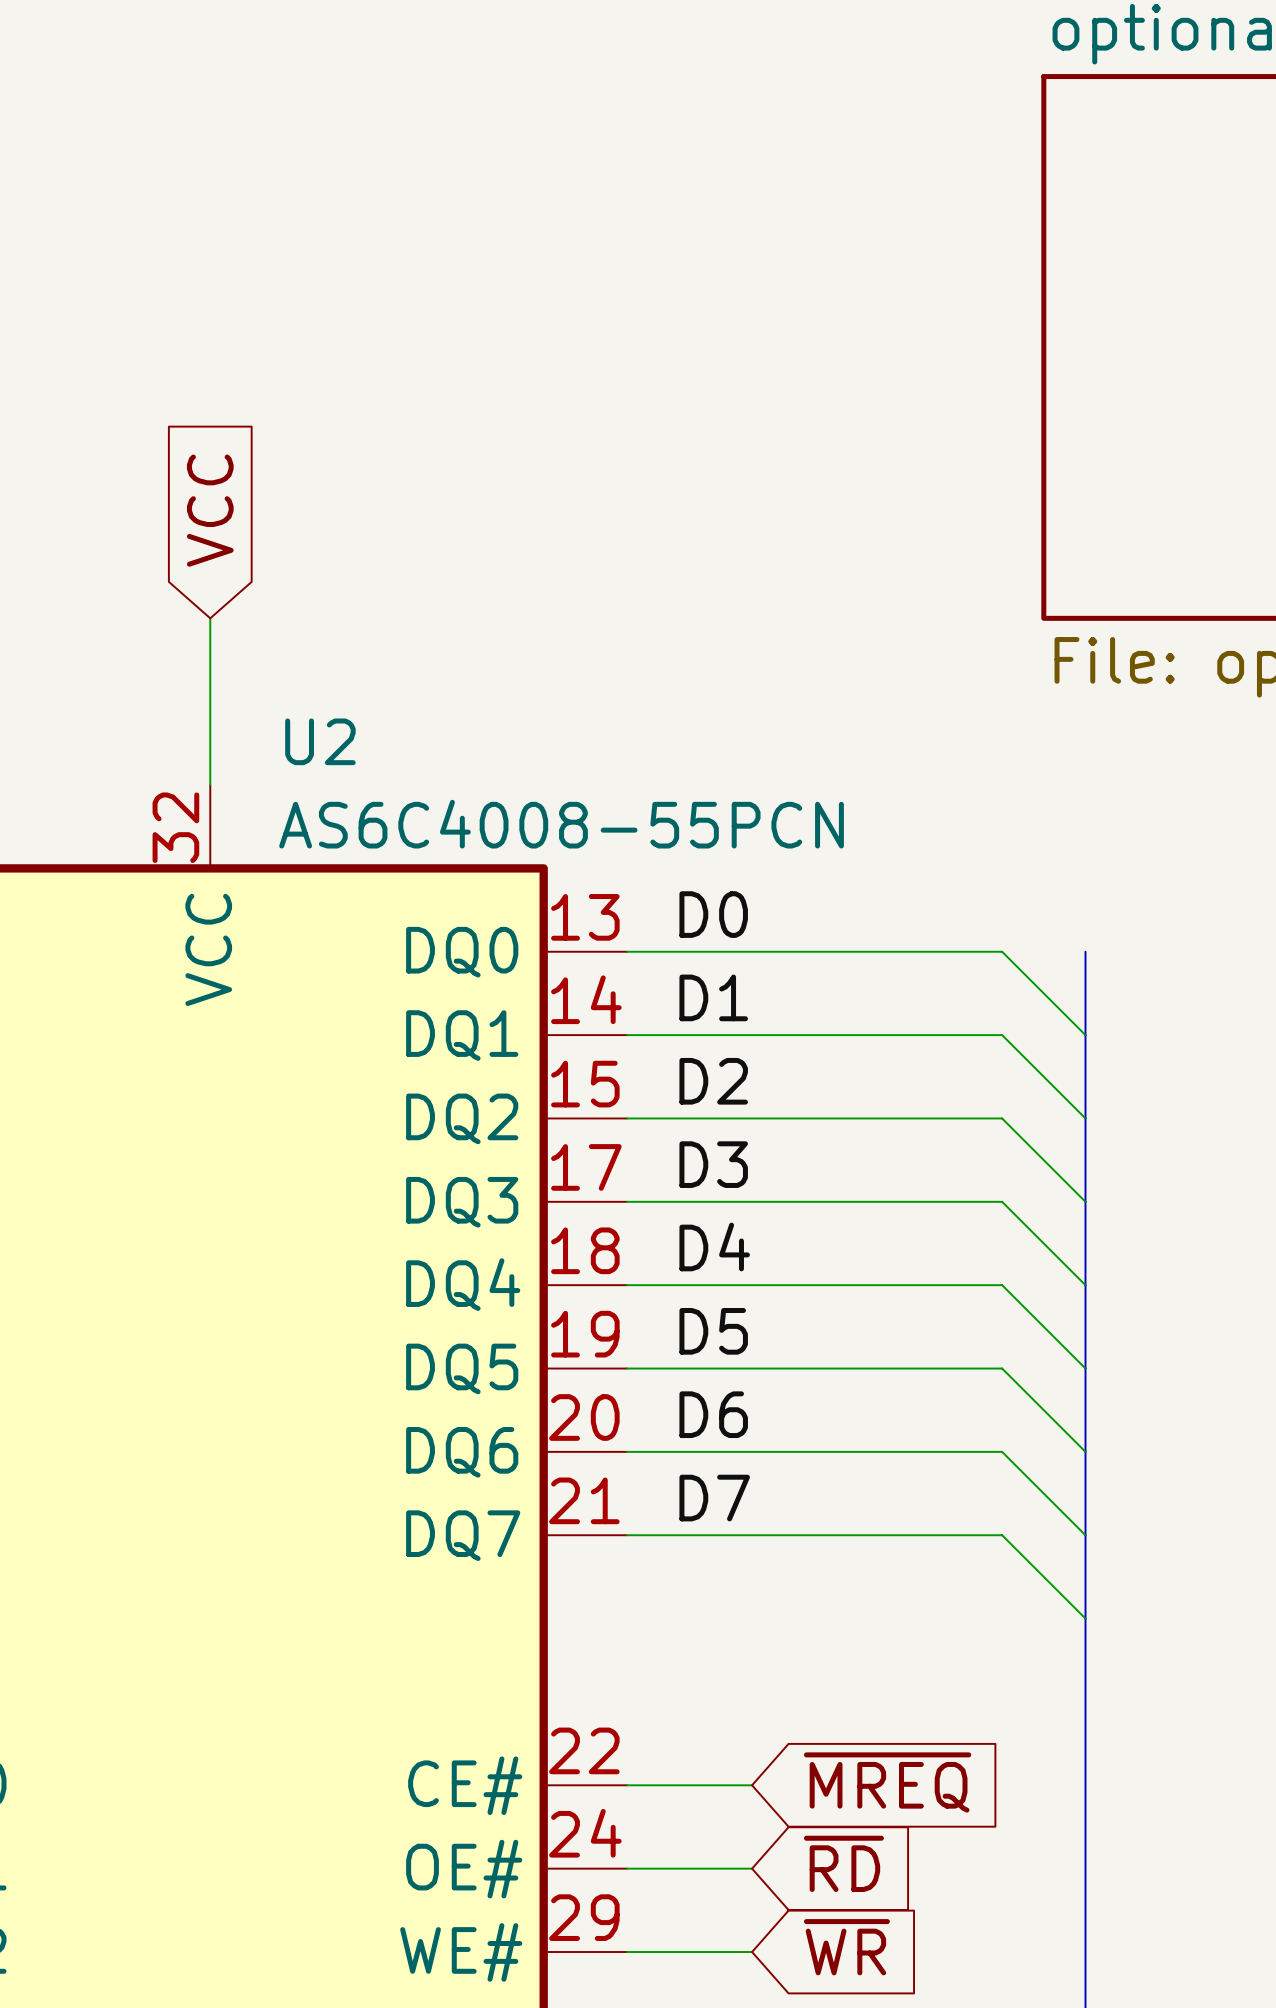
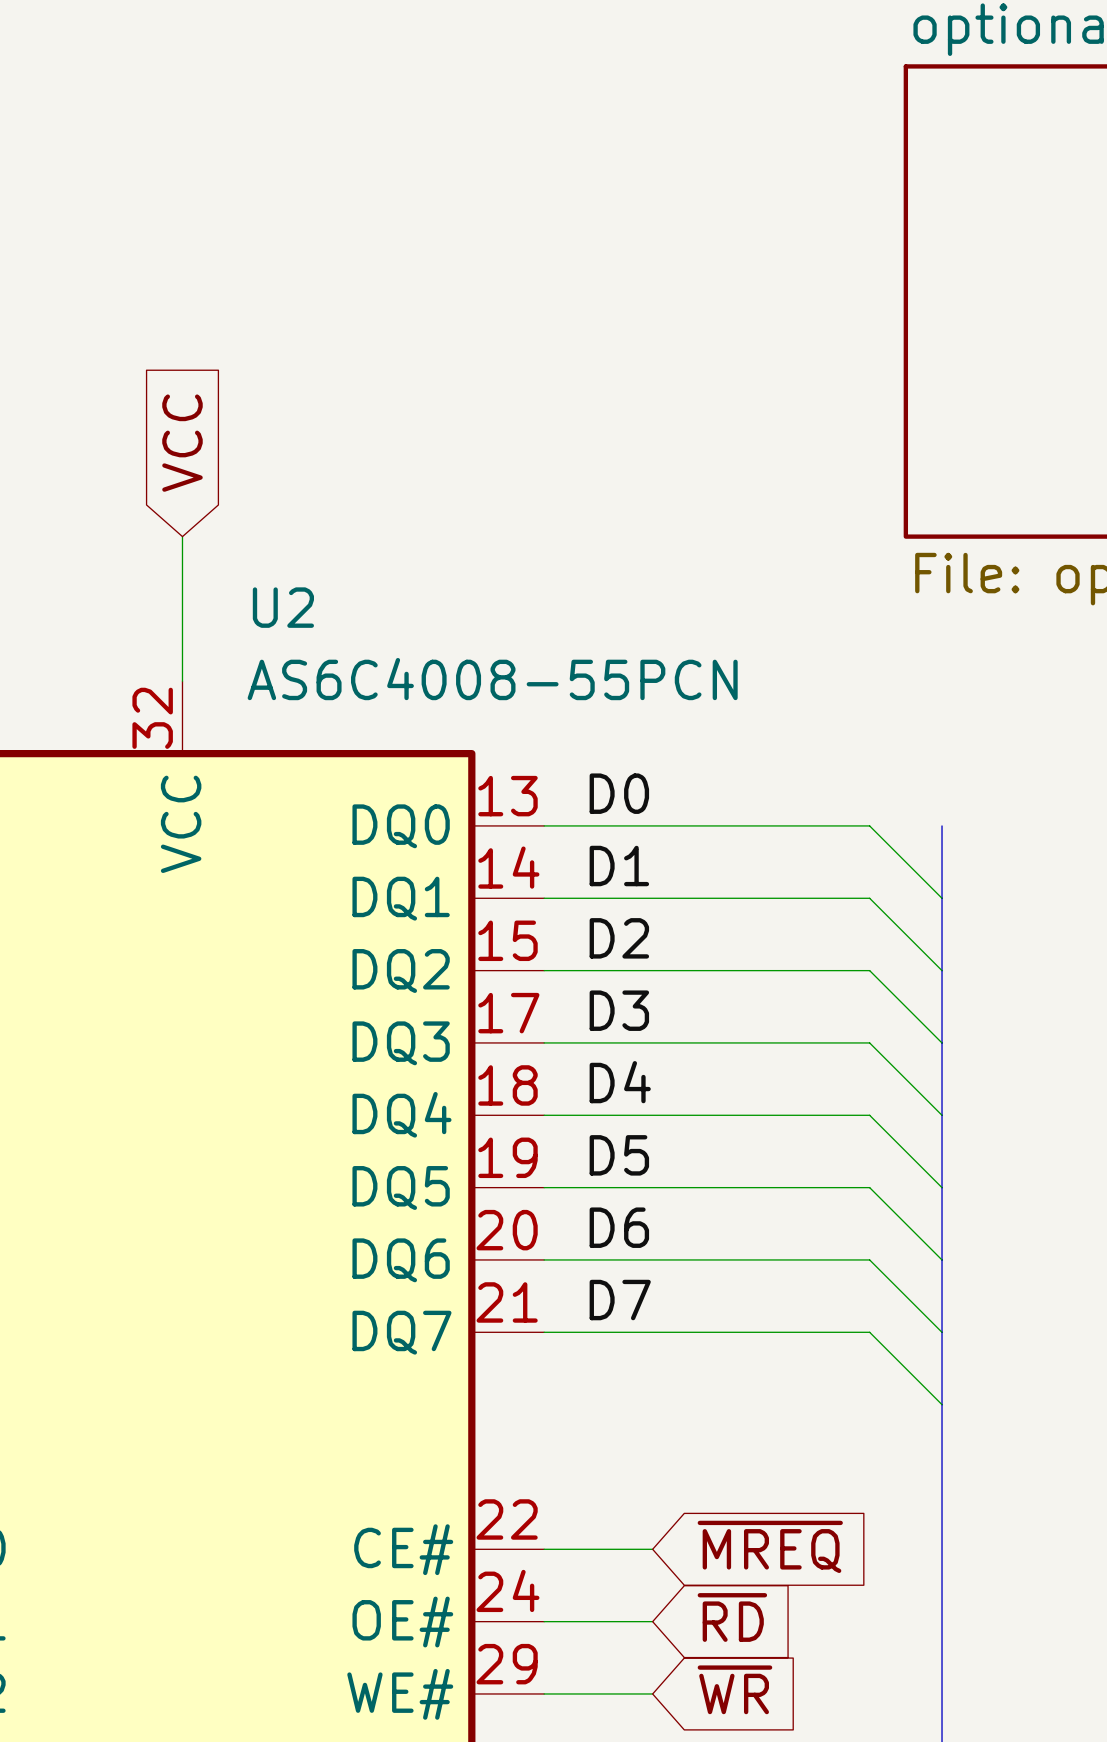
U2 name position: U2 (320, 741) -> U2 (283, 607)
U2 value position: AS6C4008-55PCN (561, 824) -> AS6C4008-55PCN (492, 679)

